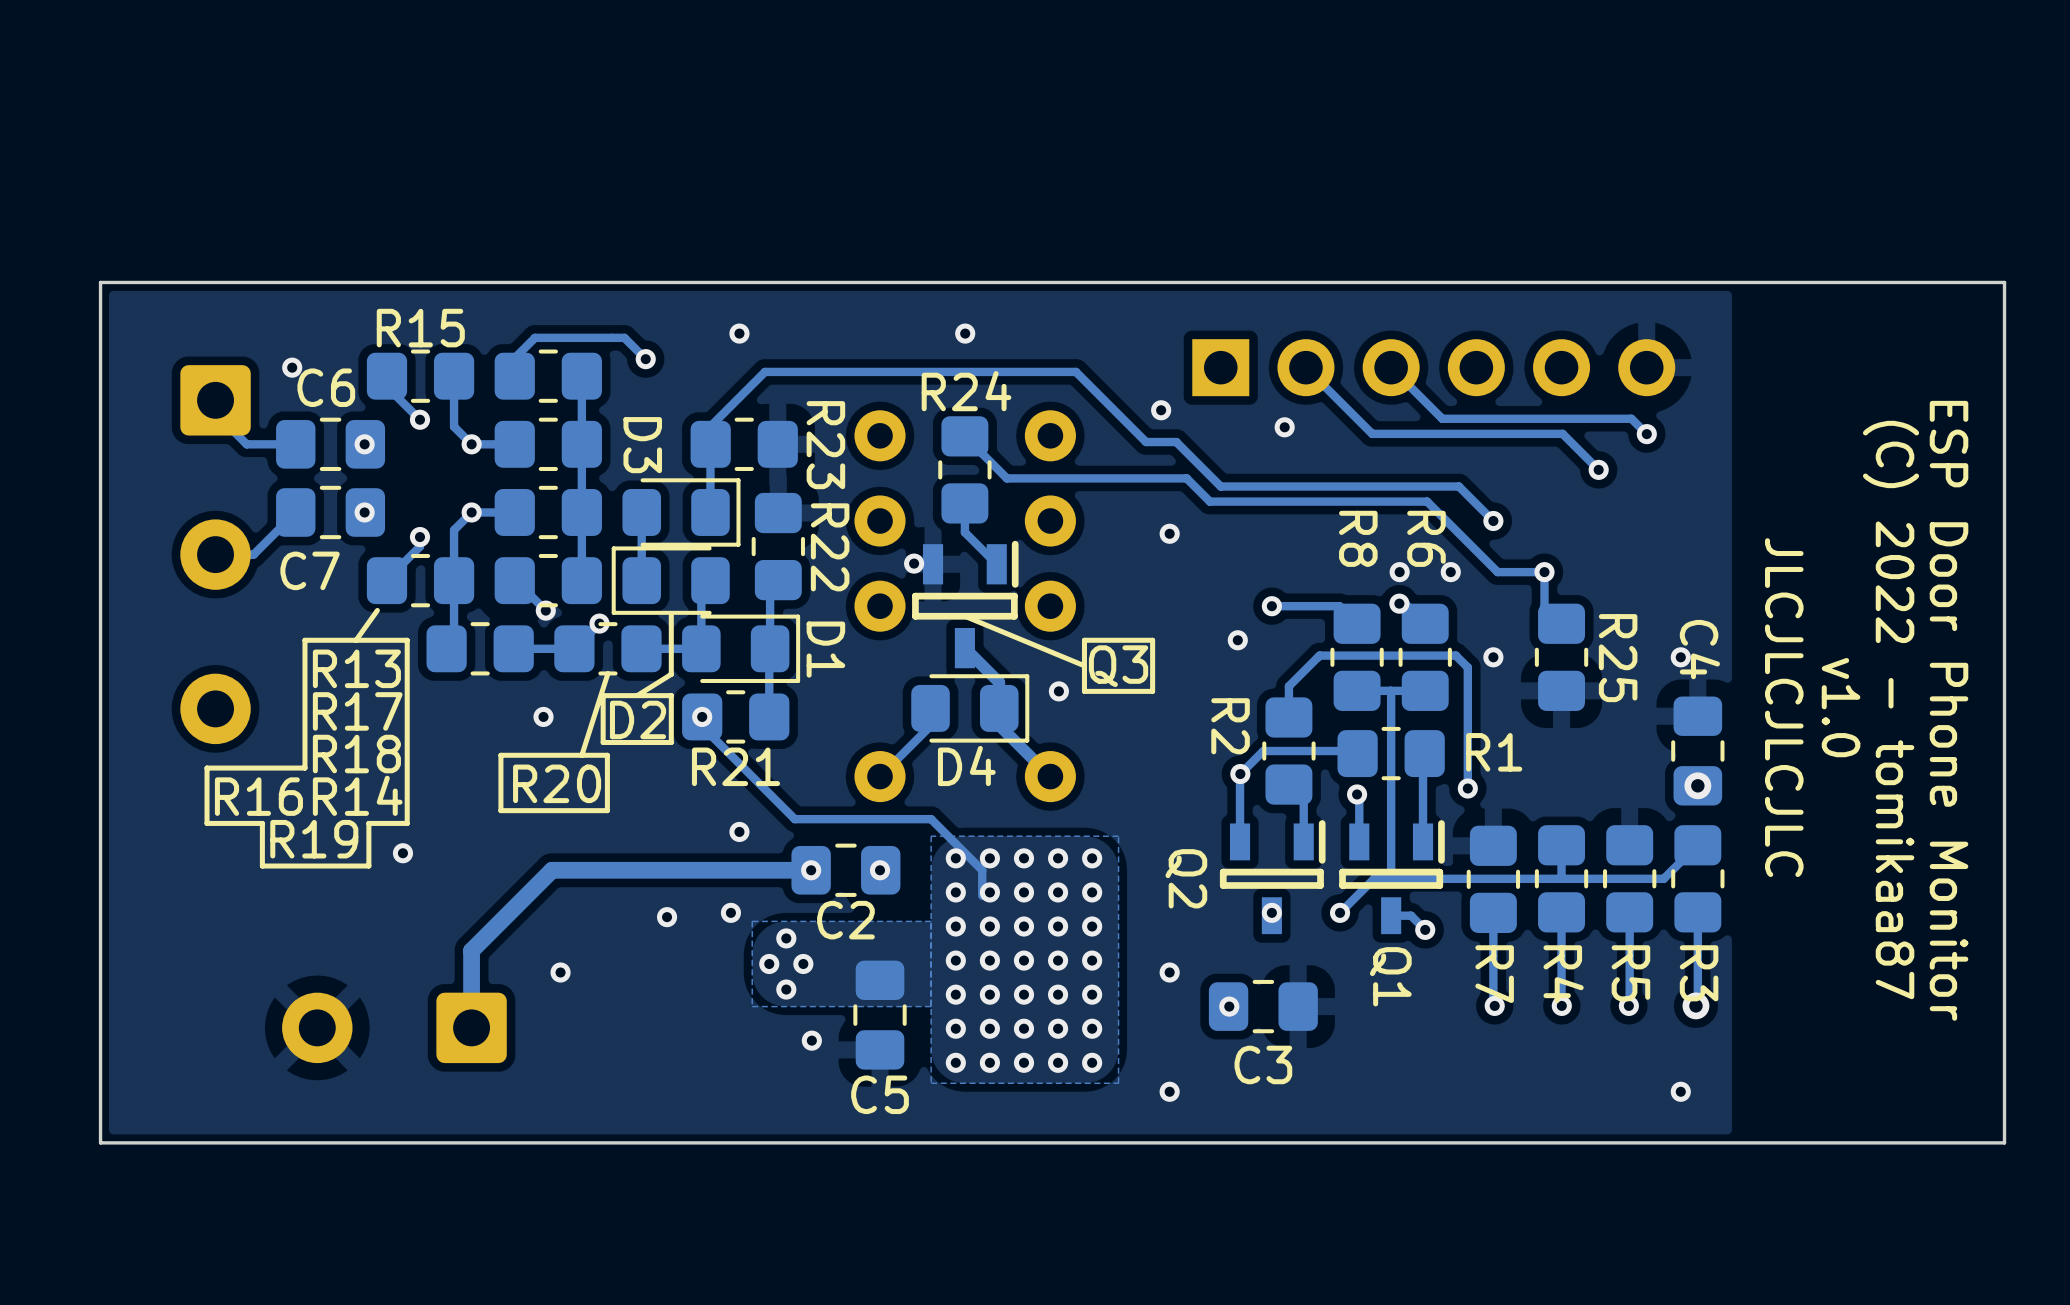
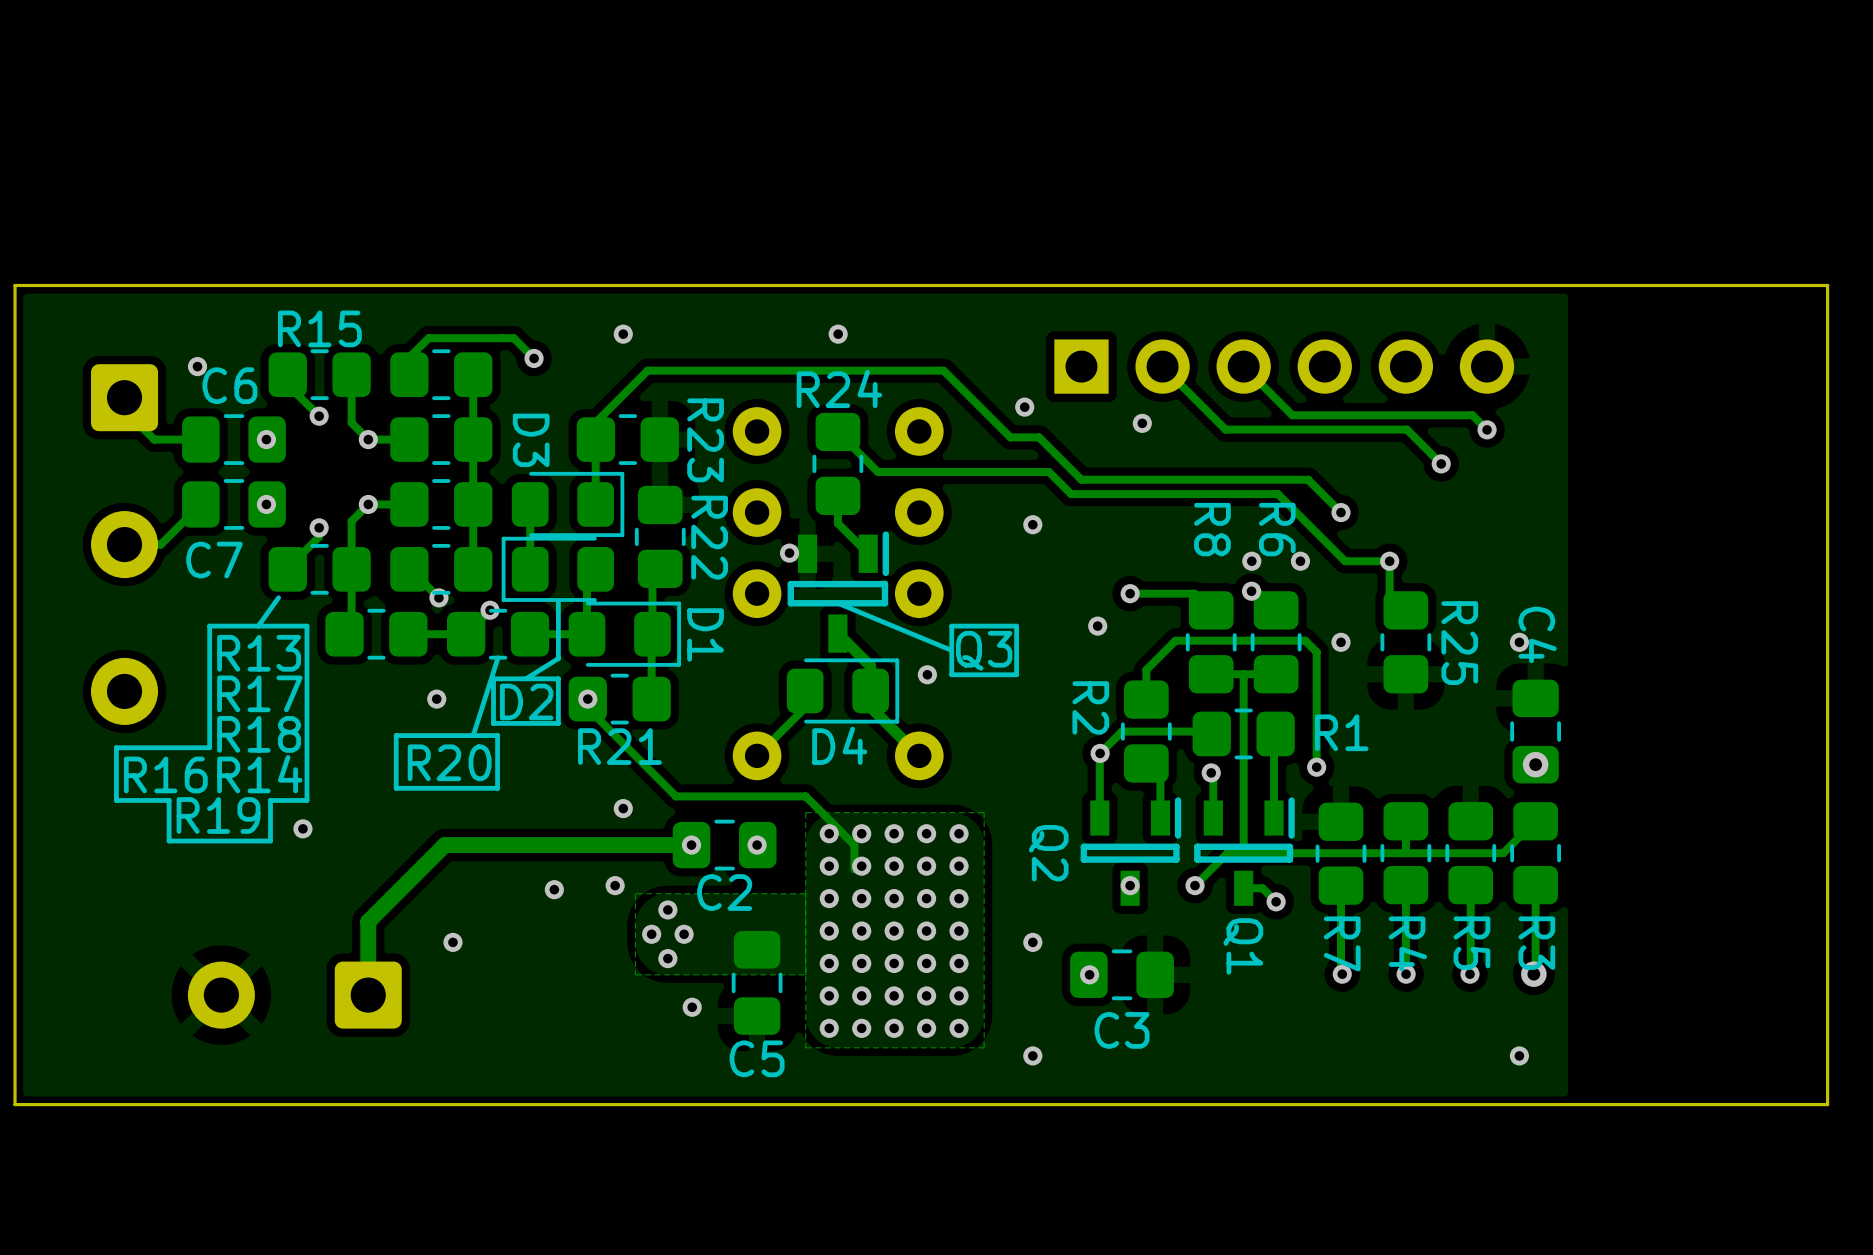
text: JLCJLCJLCJLC (1784, 707) -> none
text: v1.0 (1841, 707) -> none
text: (C) 2022 - tomikaa87 (1891, 710) -> none
text: ESP Door Phone Monitor (1949, 710) -> none

